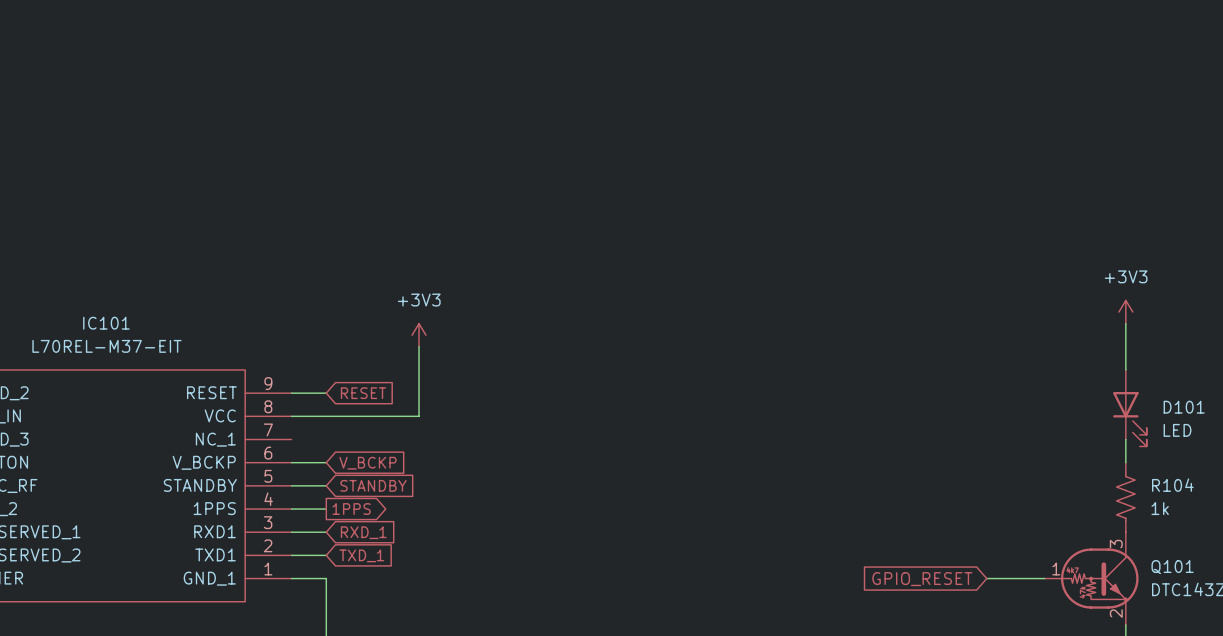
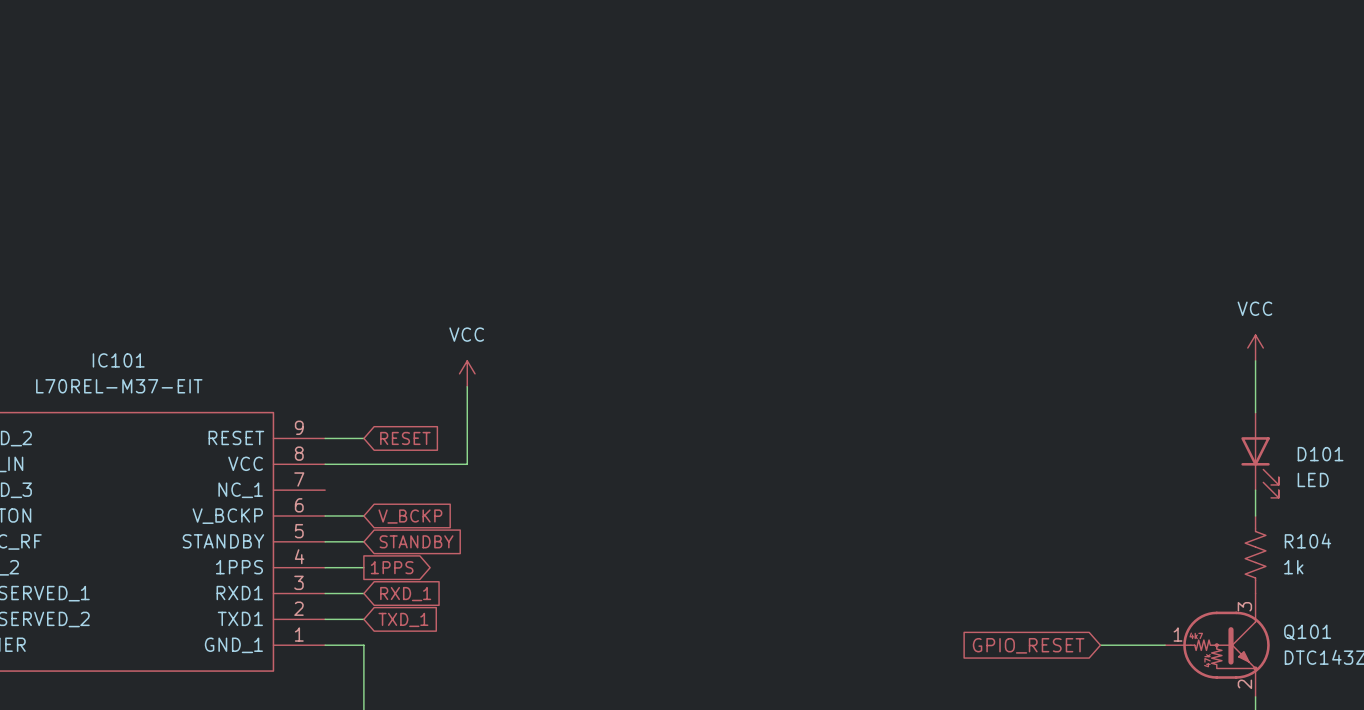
power symbol: +3V3 (1125, 312) -> VCC (1255, 347)
power symbol: +3V3 (419, 335) -> VCC (467, 373)

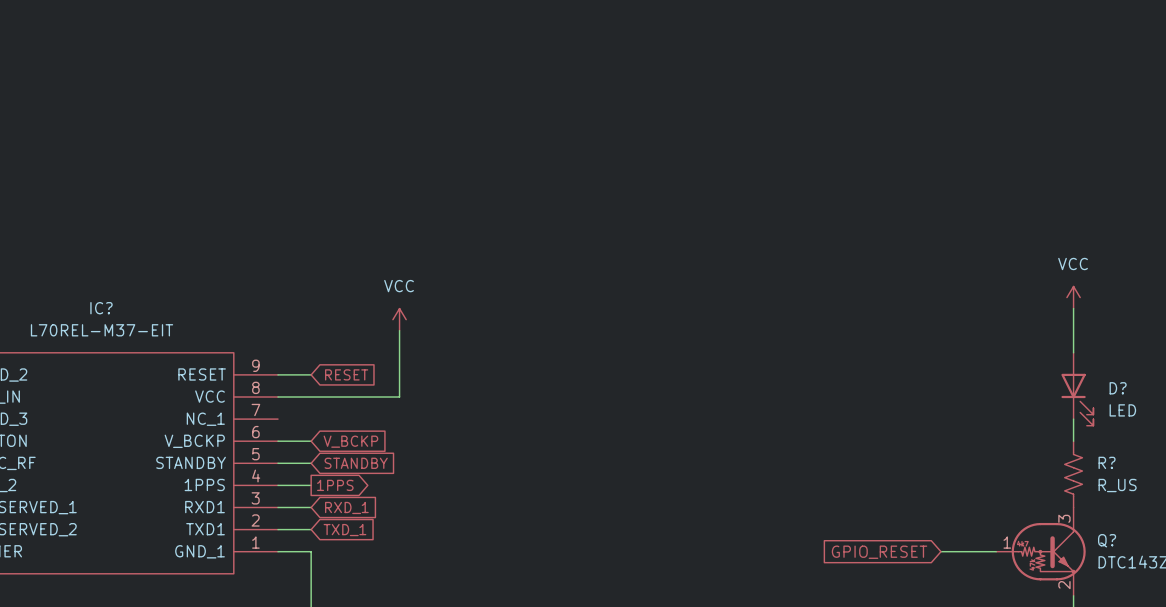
IC101 name: IC101 (118, 360) -> IC? (101, 308)
D101 name: D101 (1320, 454) -> D? (1118, 388)
R104 name: R104 (1307, 541) -> R? (1107, 462)
R104 value: 1k (1293, 567) -> R_US (1117, 485)
Q101 name: Q101 (1307, 632) -> Q? (1107, 540)

